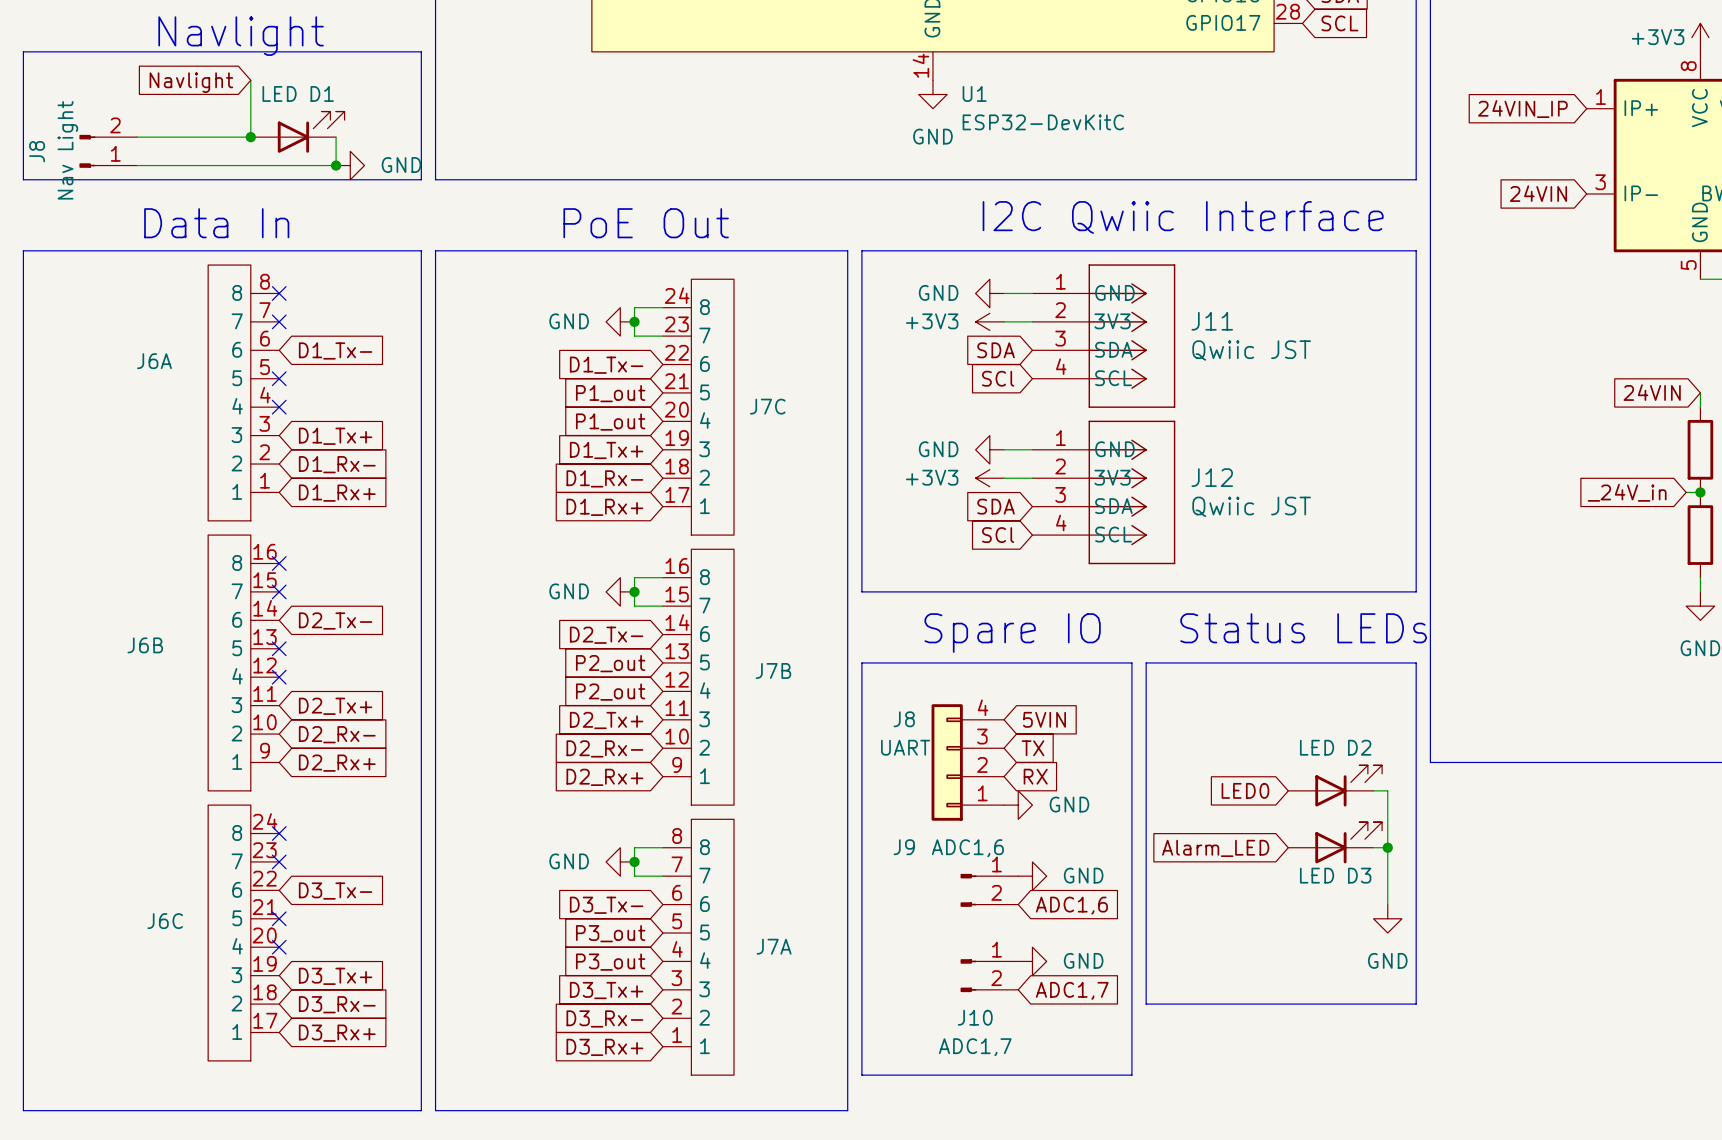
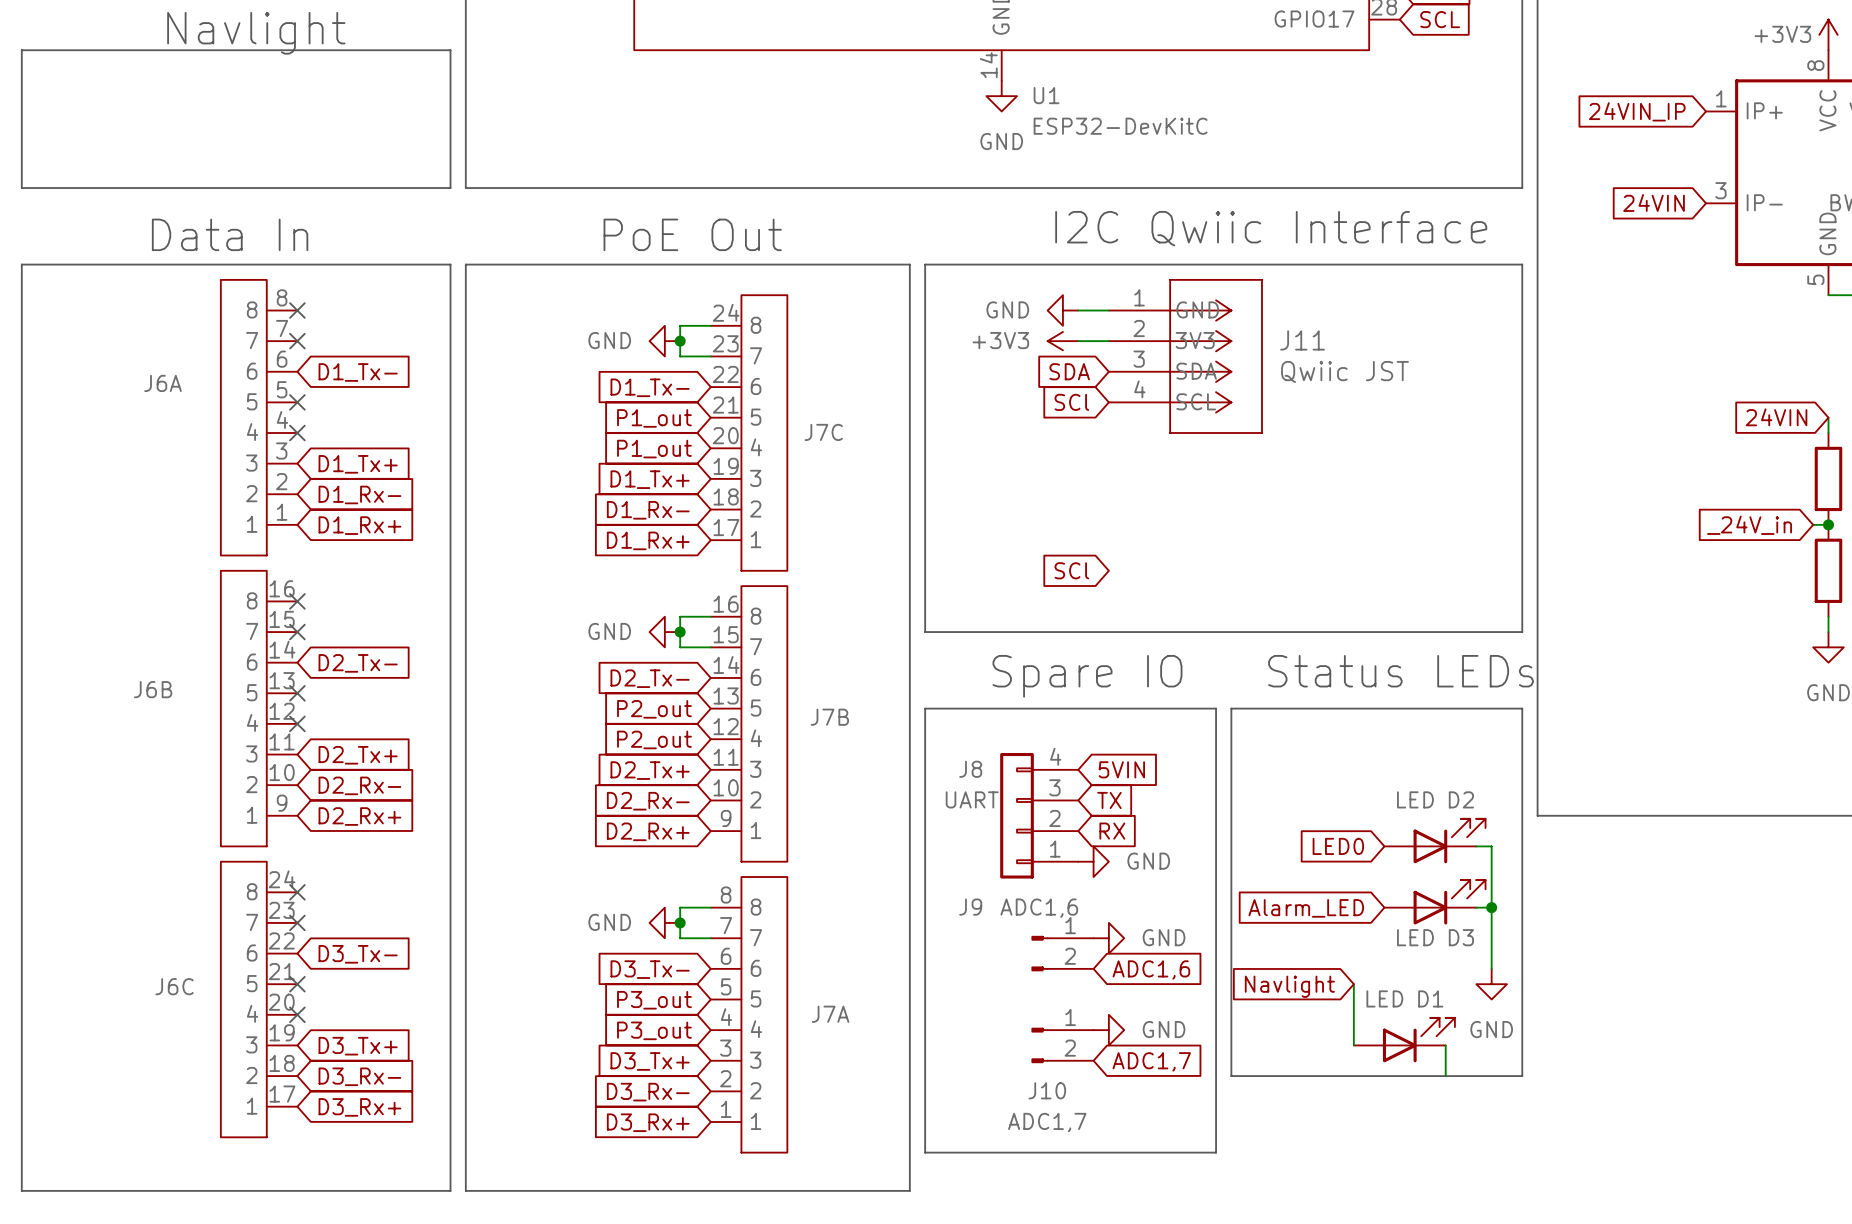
wire: (250, 80) (250, 137) (137, 137) -> none
global label: Navlight (191, 82) -> none
D1 position: (297, 132) -> (1404, 1040)
junction: (250, 137) -> none
wire: (336, 137) (336, 165) (137, 165) -> none
J8: Nav Light (108, 151) -> none
junction: (336, 165) -> none
power symbol: GND (350, 165) -> none
power symbol: GND (989, 449) -> none
wire: (1004, 449) (1032, 449) -> none
power symbol: +3V3 (989, 478) -> none
wire: (1004, 478) (1032, 478) -> none
J12: Qwiic JST (1103, 492) -> none
global label: SDA (996, 506) -> none
wire: none -> (1353, 984) (1353, 1045)
global label: none -> Navlight (1289, 986)
wire: none -> (1445, 1045) (1445, 1076)

